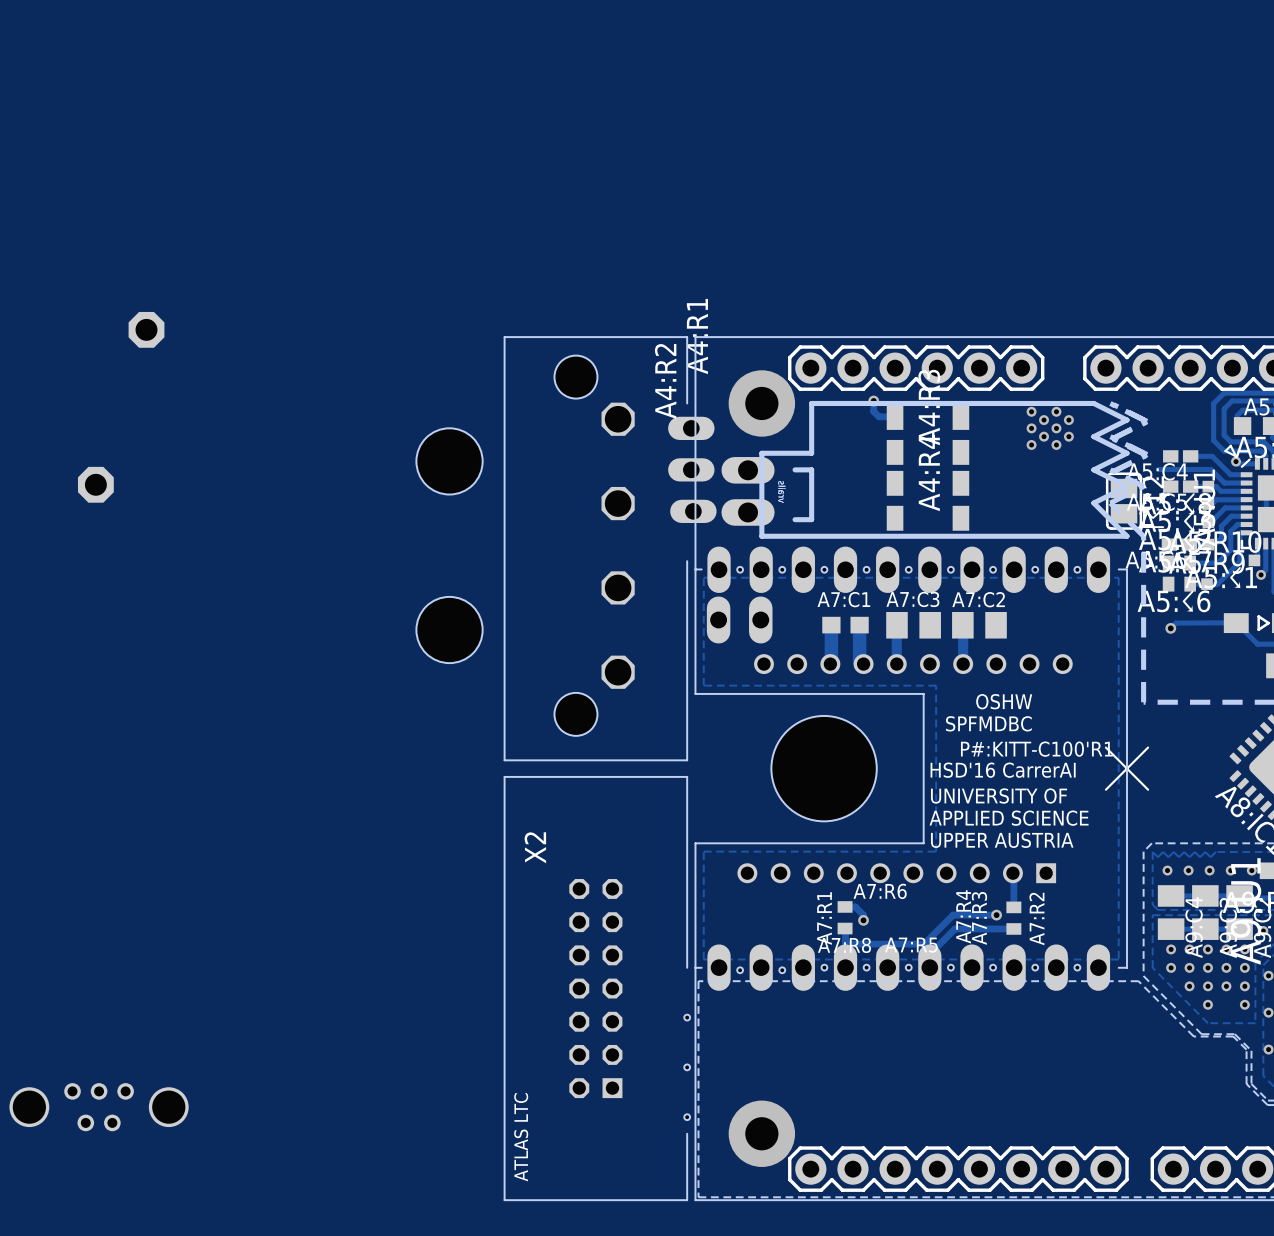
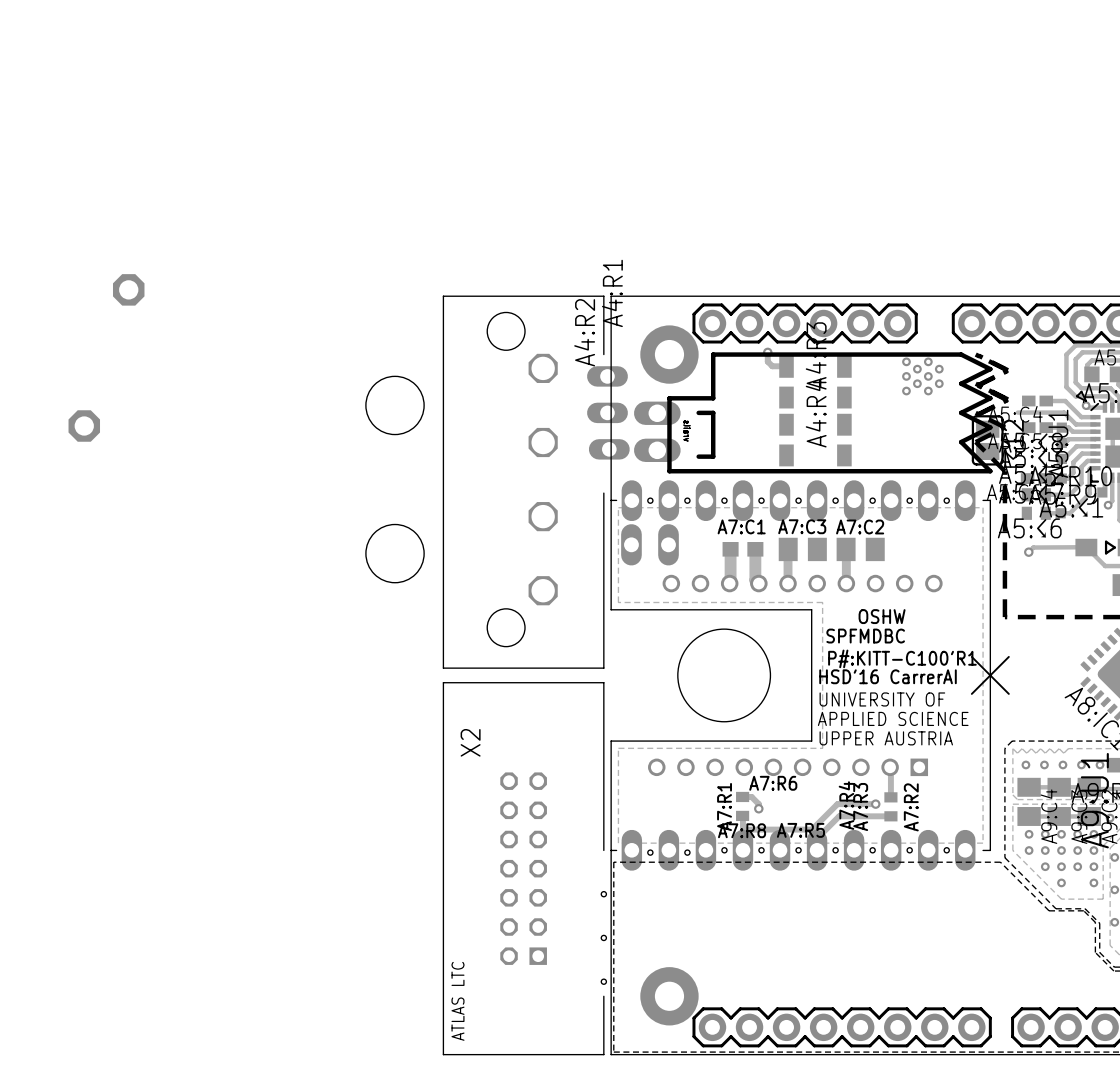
part: (99, 1107) -> none

